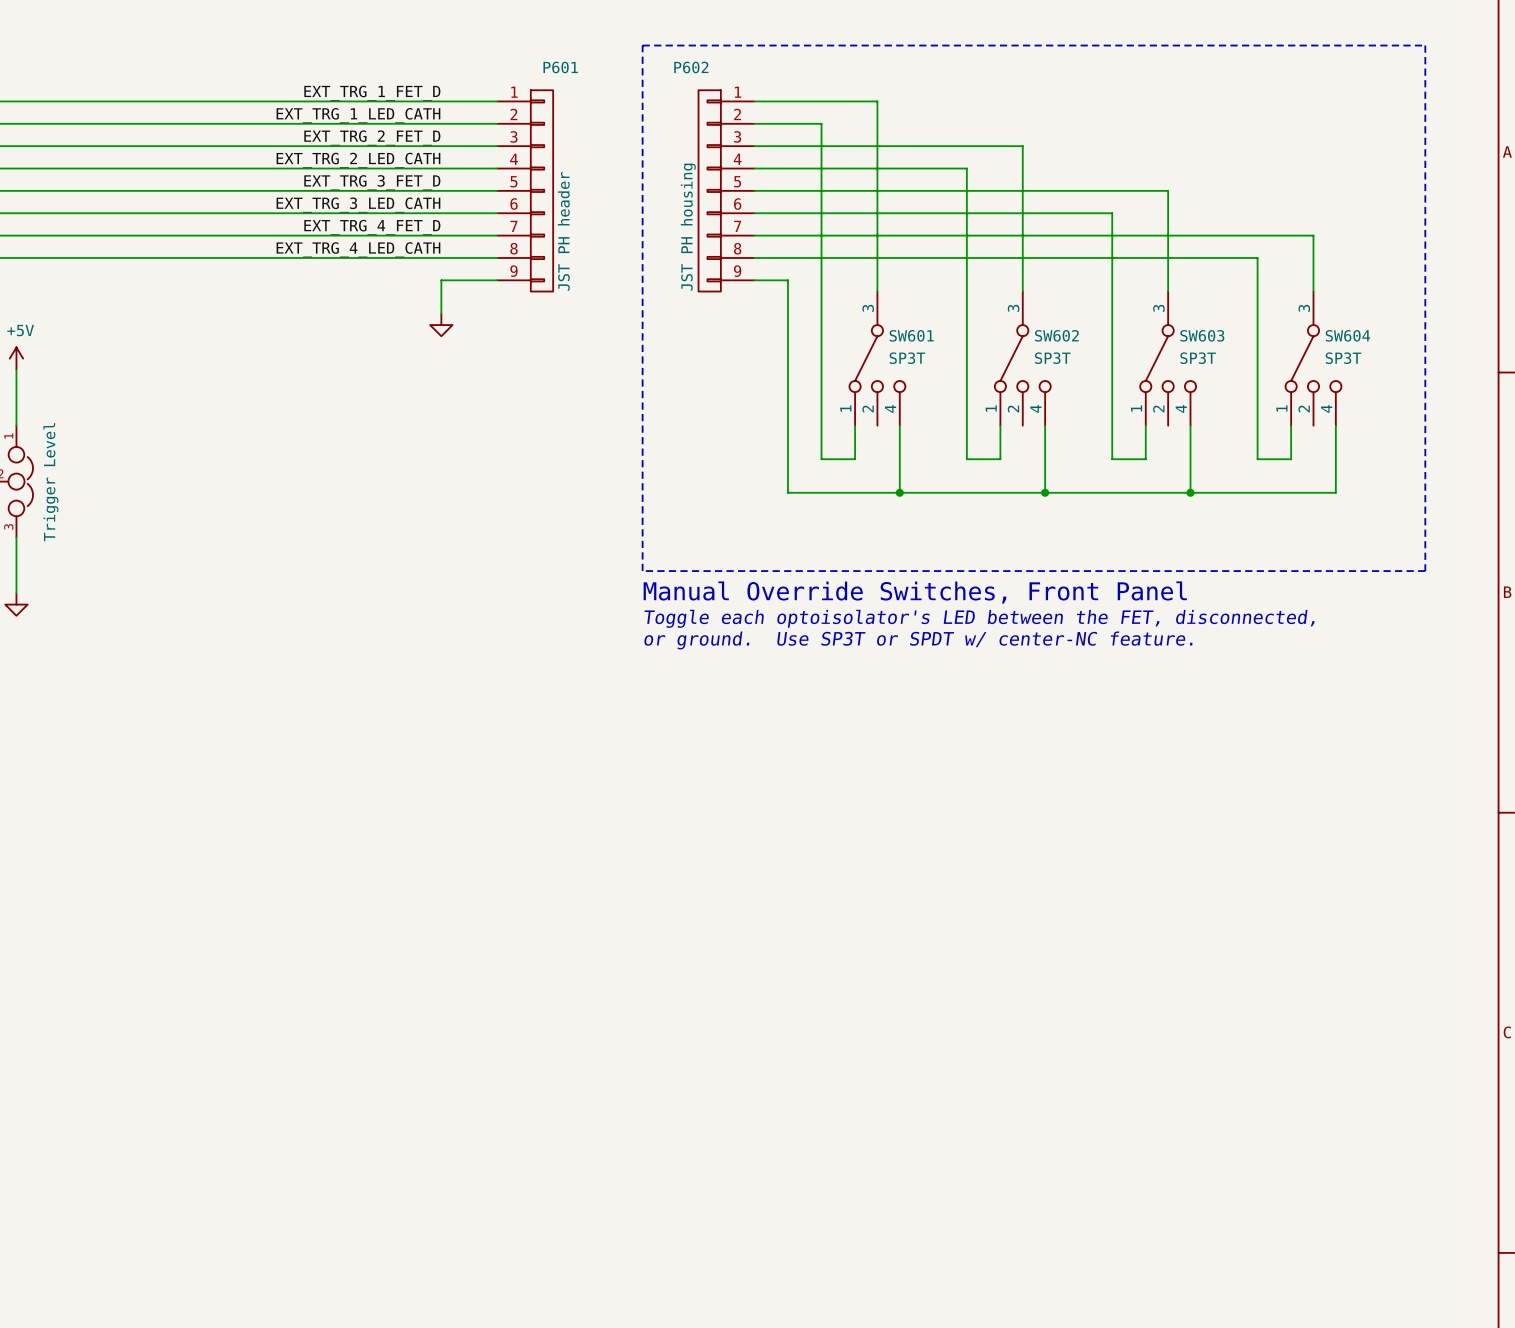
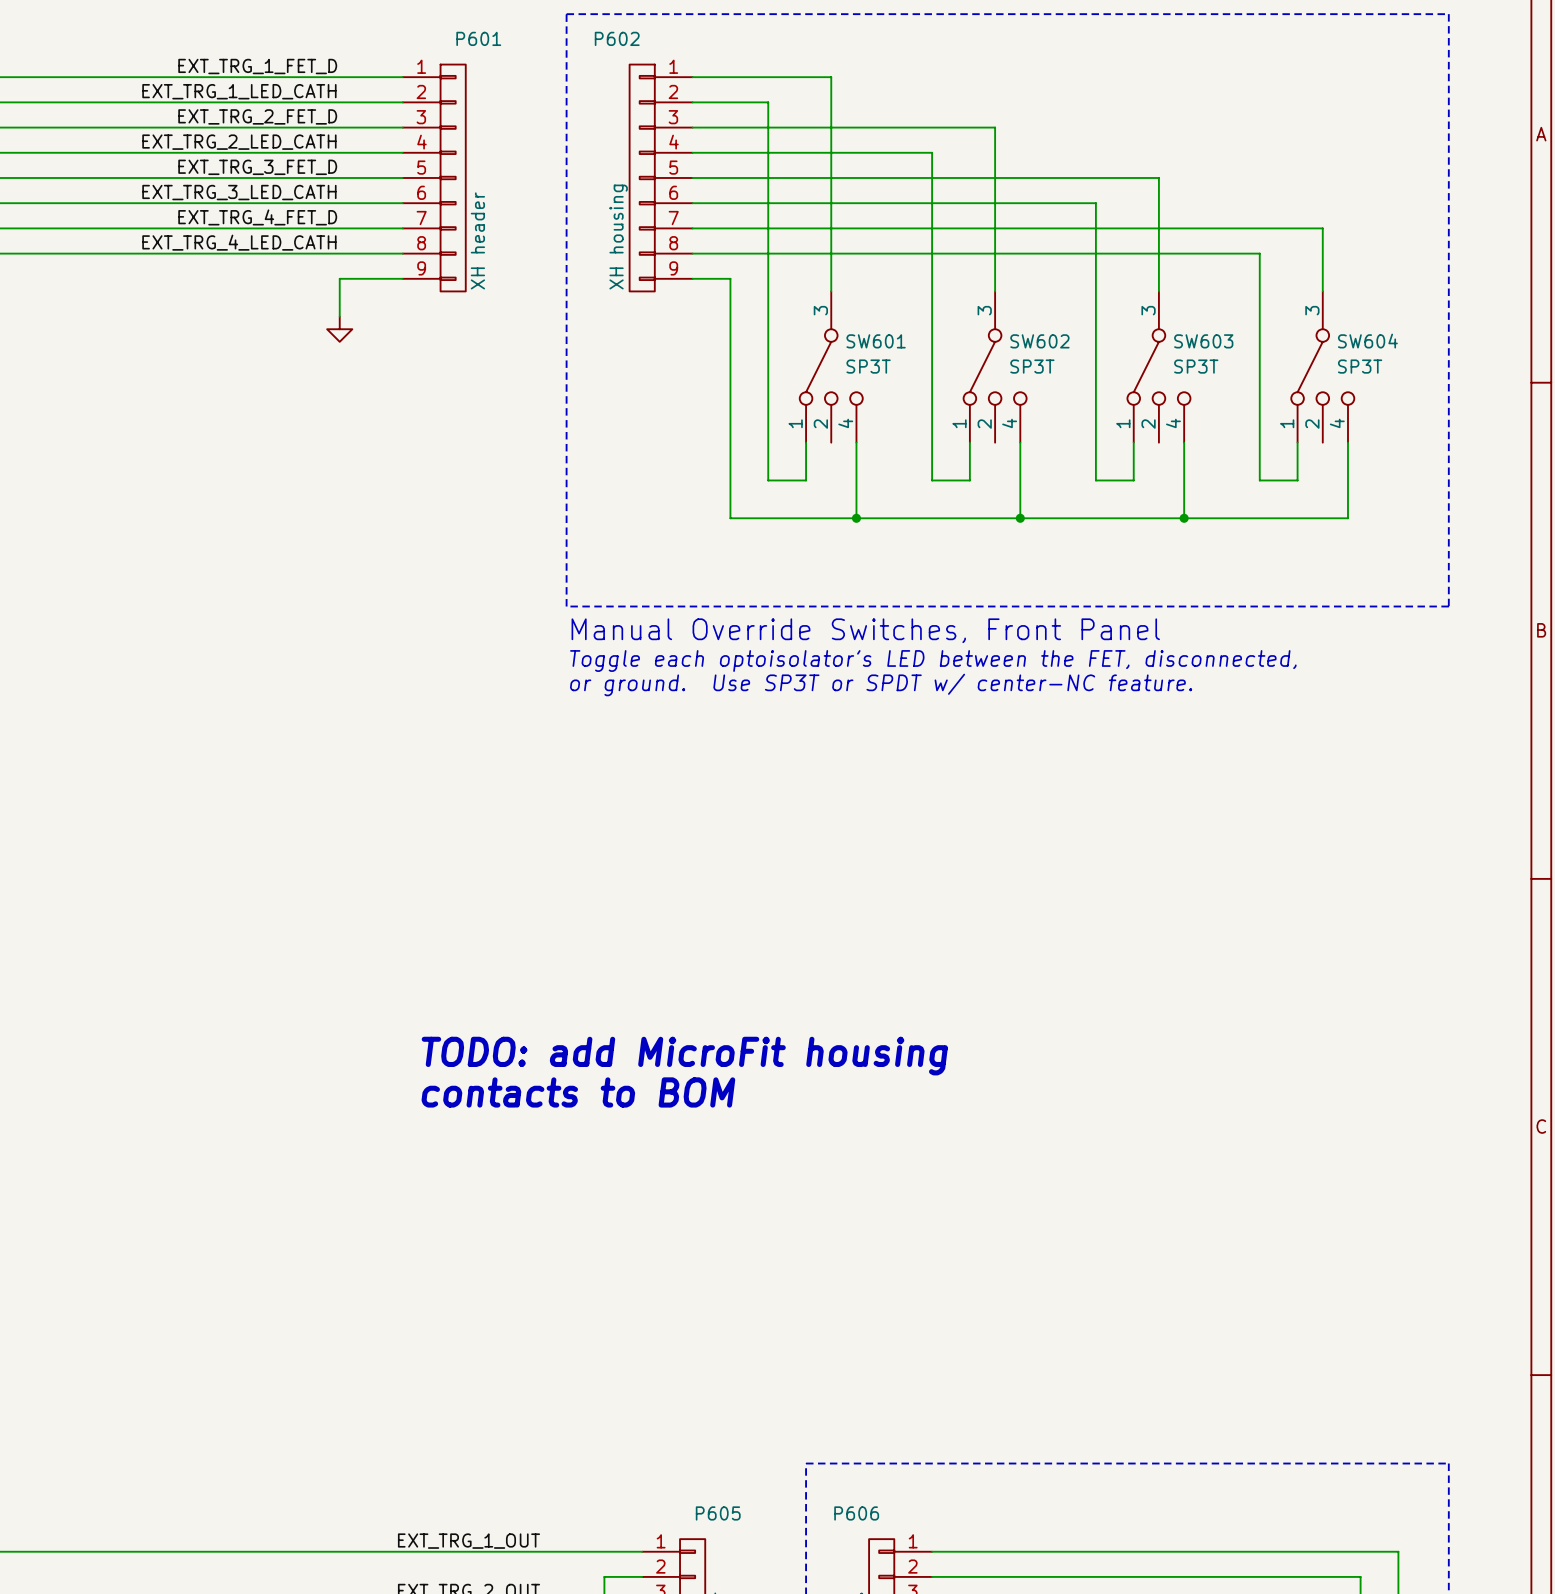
P602 value: JST PH housing (688, 227) -> XH housing (618, 237)
P601 value: JST PH header (563, 231) -> XH header (477, 240)
text: none -> TODO: add MicroFit housing (684, 1056)
text: none -> contacts to BOM (578, 1092)

